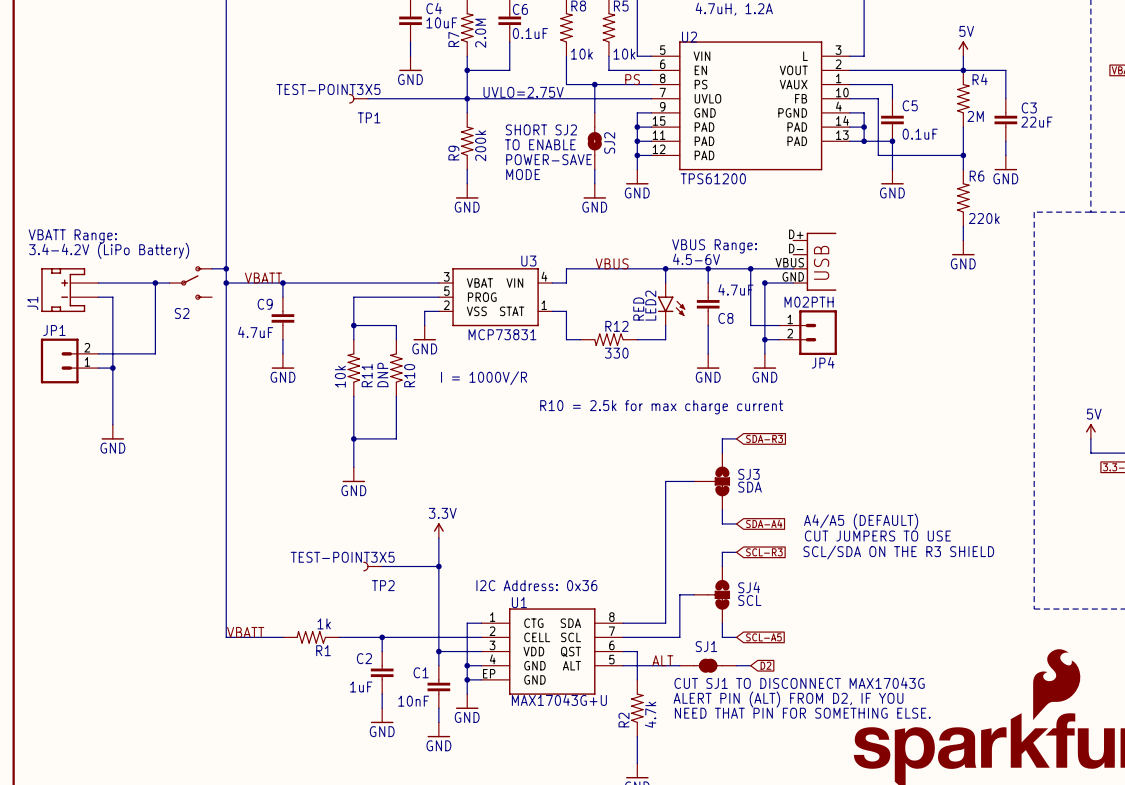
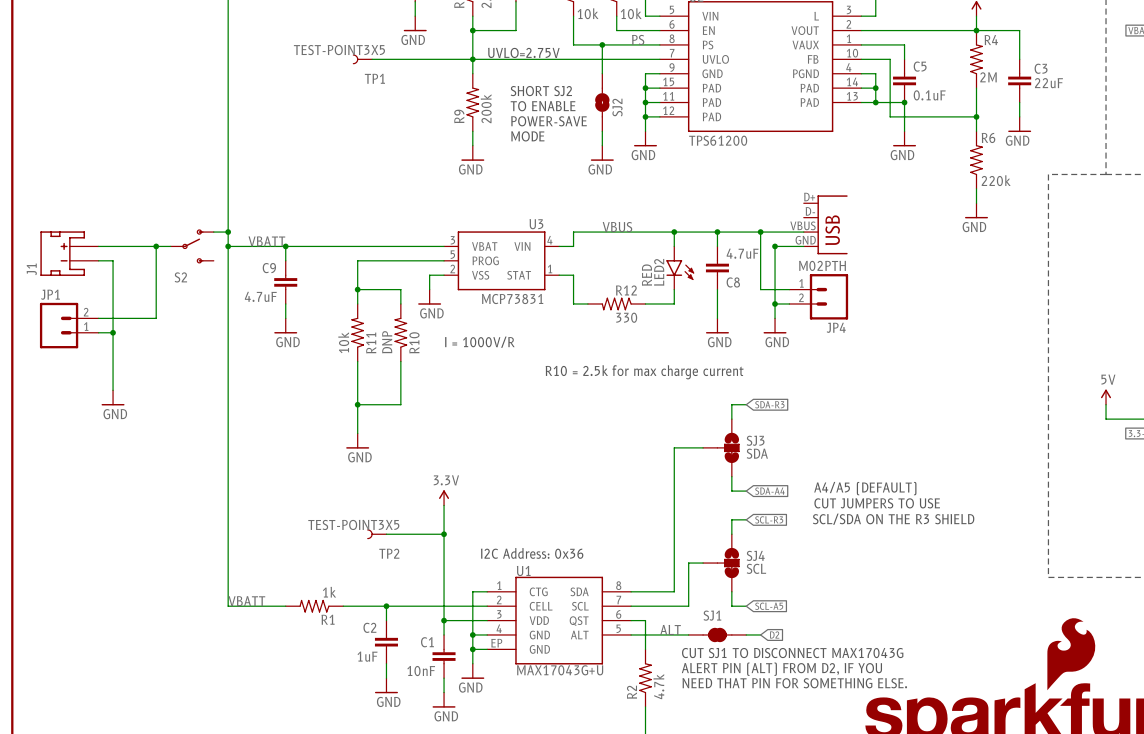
text: VBATT Range: (72, 236) -> none
text: VBUS Range: (714, 246) -> none
text: 3.4-4.2V (LiPo Battery) (109, 250) -> none
text: 4.5-6V (696, 259) -> none

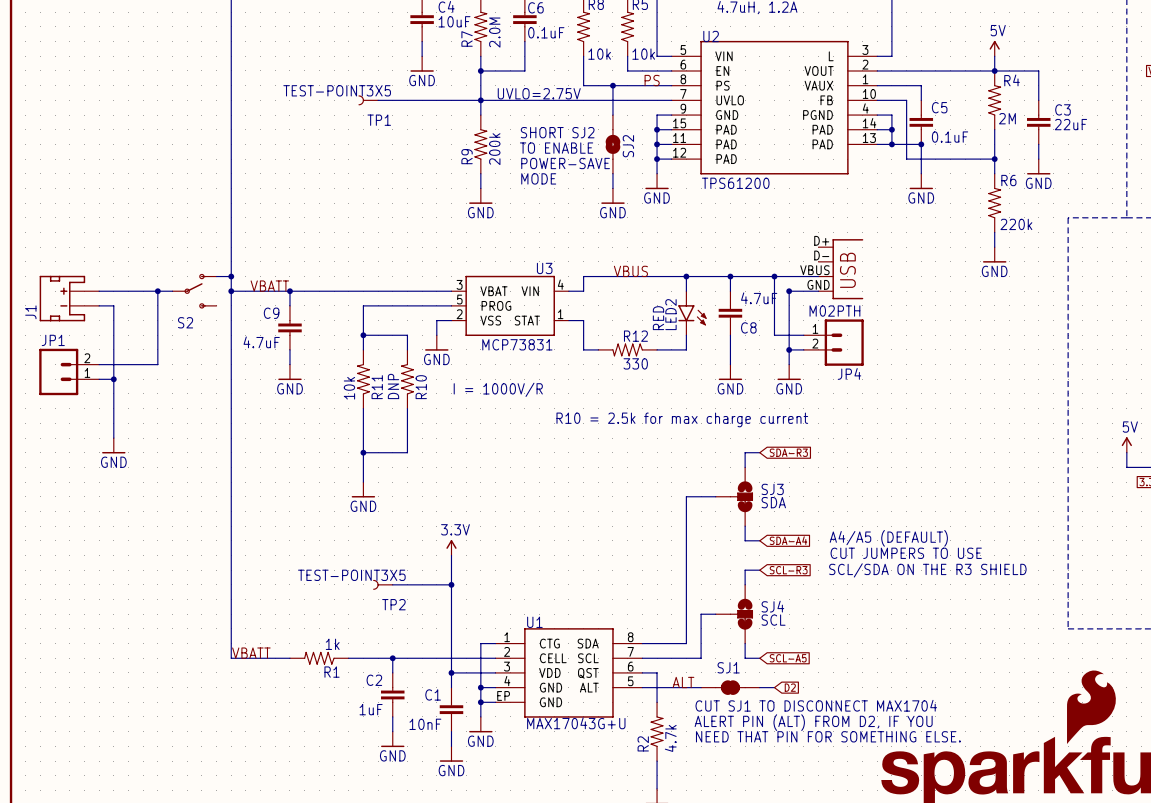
text: I2C Address: 0x36 (532, 553) -> none
text: CUT SJ1 TO DISCONNECT MAX17043G (792, 653) -> CUT SJ1 TO DISCONNECT MAX1704 (816, 705)

